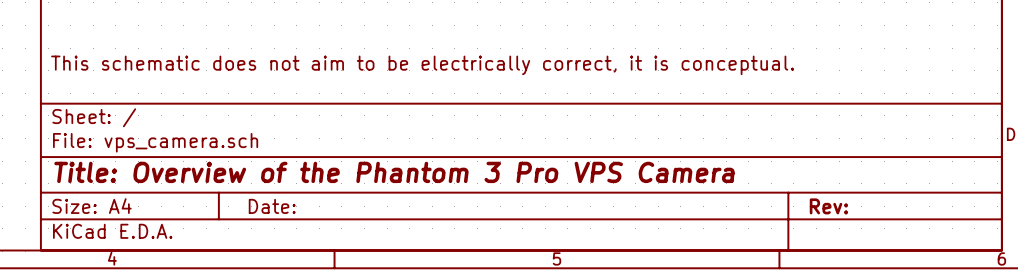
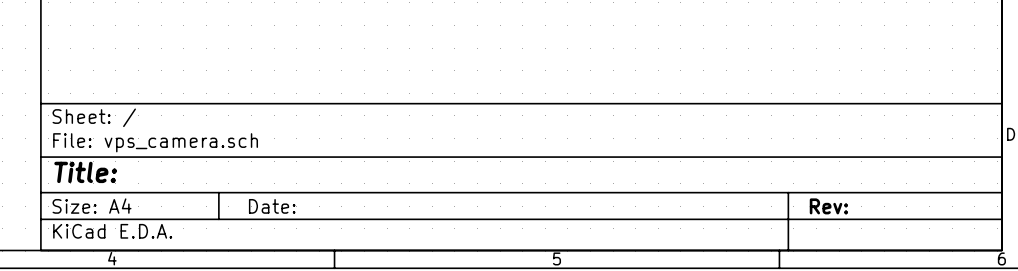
title block: This schematic does not aim to be electrically correct, it is conceptual. (422, 65) -> none
title block: Title: Overview of the Phantom 3 Pro VPS Camera (394, 172) -> Title: (85, 172)

